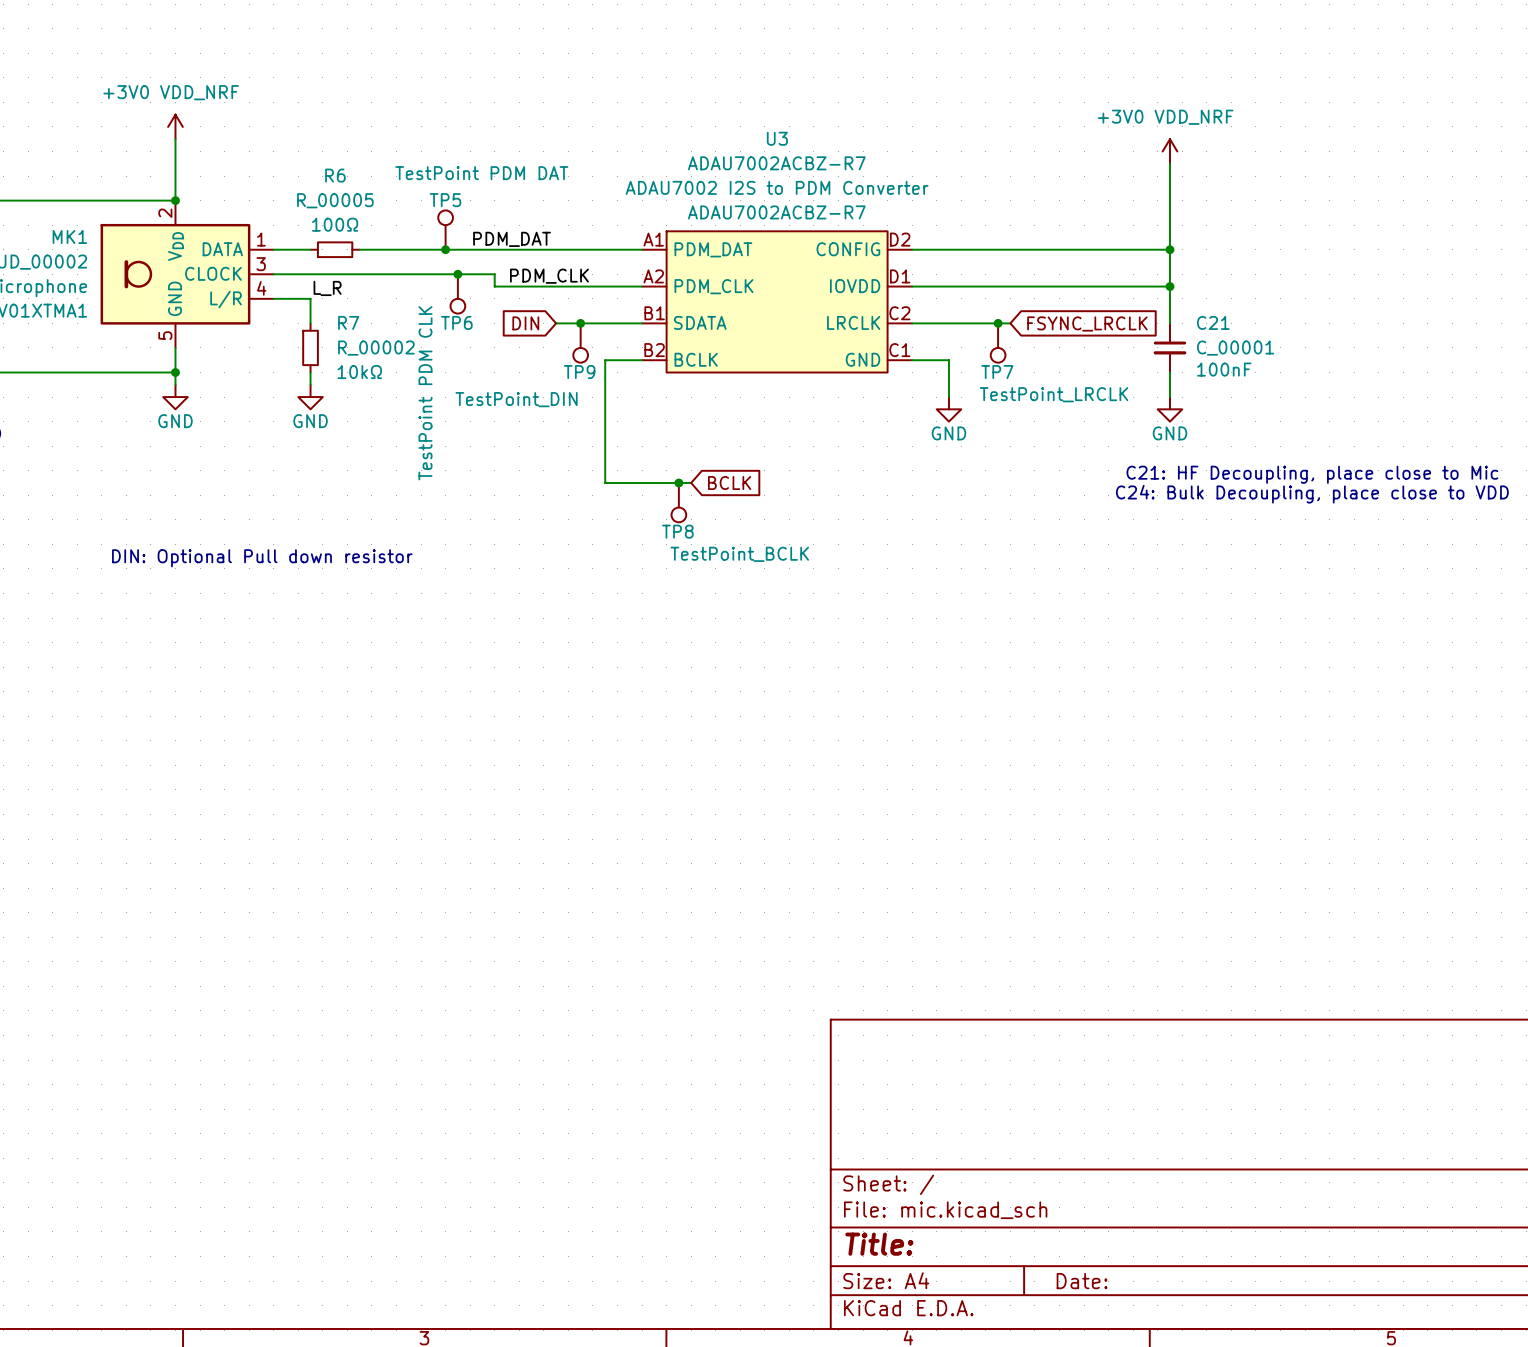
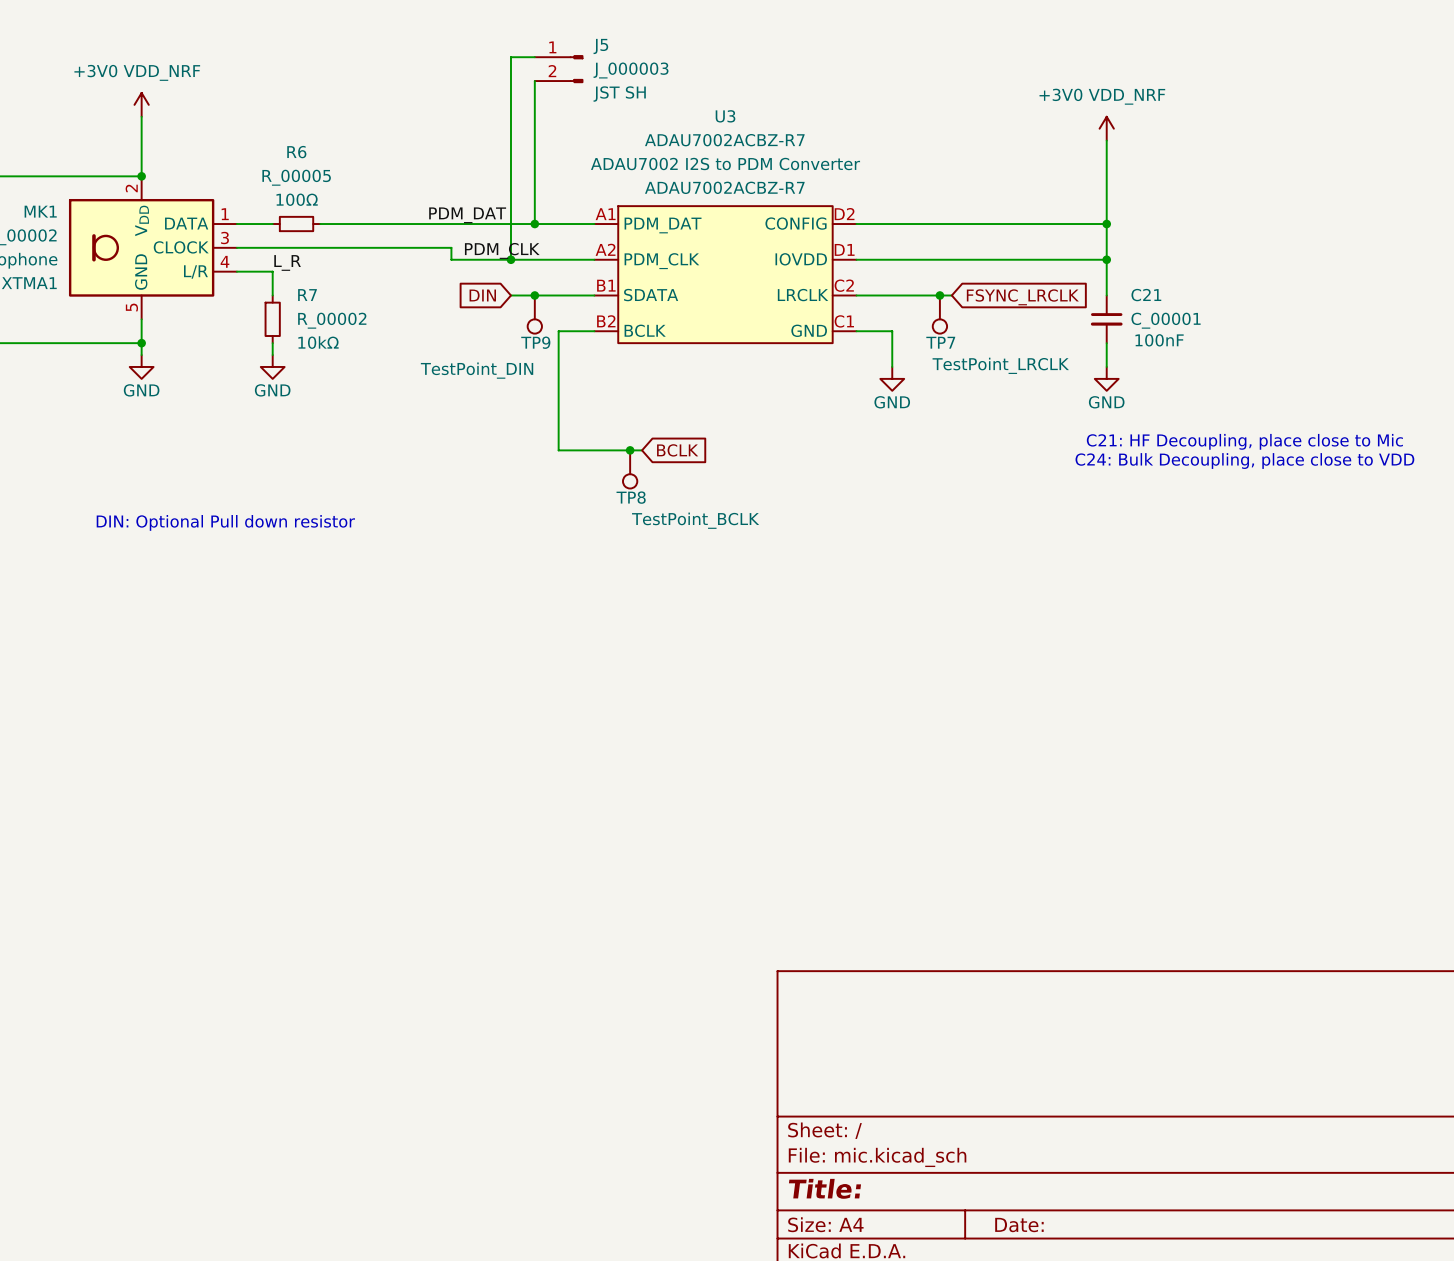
wire: none -> (534, 57) (510, 57) (510, 259)
J5: none -> J_000003 (559, 69)
wire: none -> (534, 81) (534, 224)
TP5: TestPoint PDM DAT (445, 230) -> none
junction: (445, 249) -> none
junction: none -> (534, 224)
junction: (457, 274) -> none
junction: none -> (510, 259)
TP6: TestPoint PDM CLK (457, 293) -> none

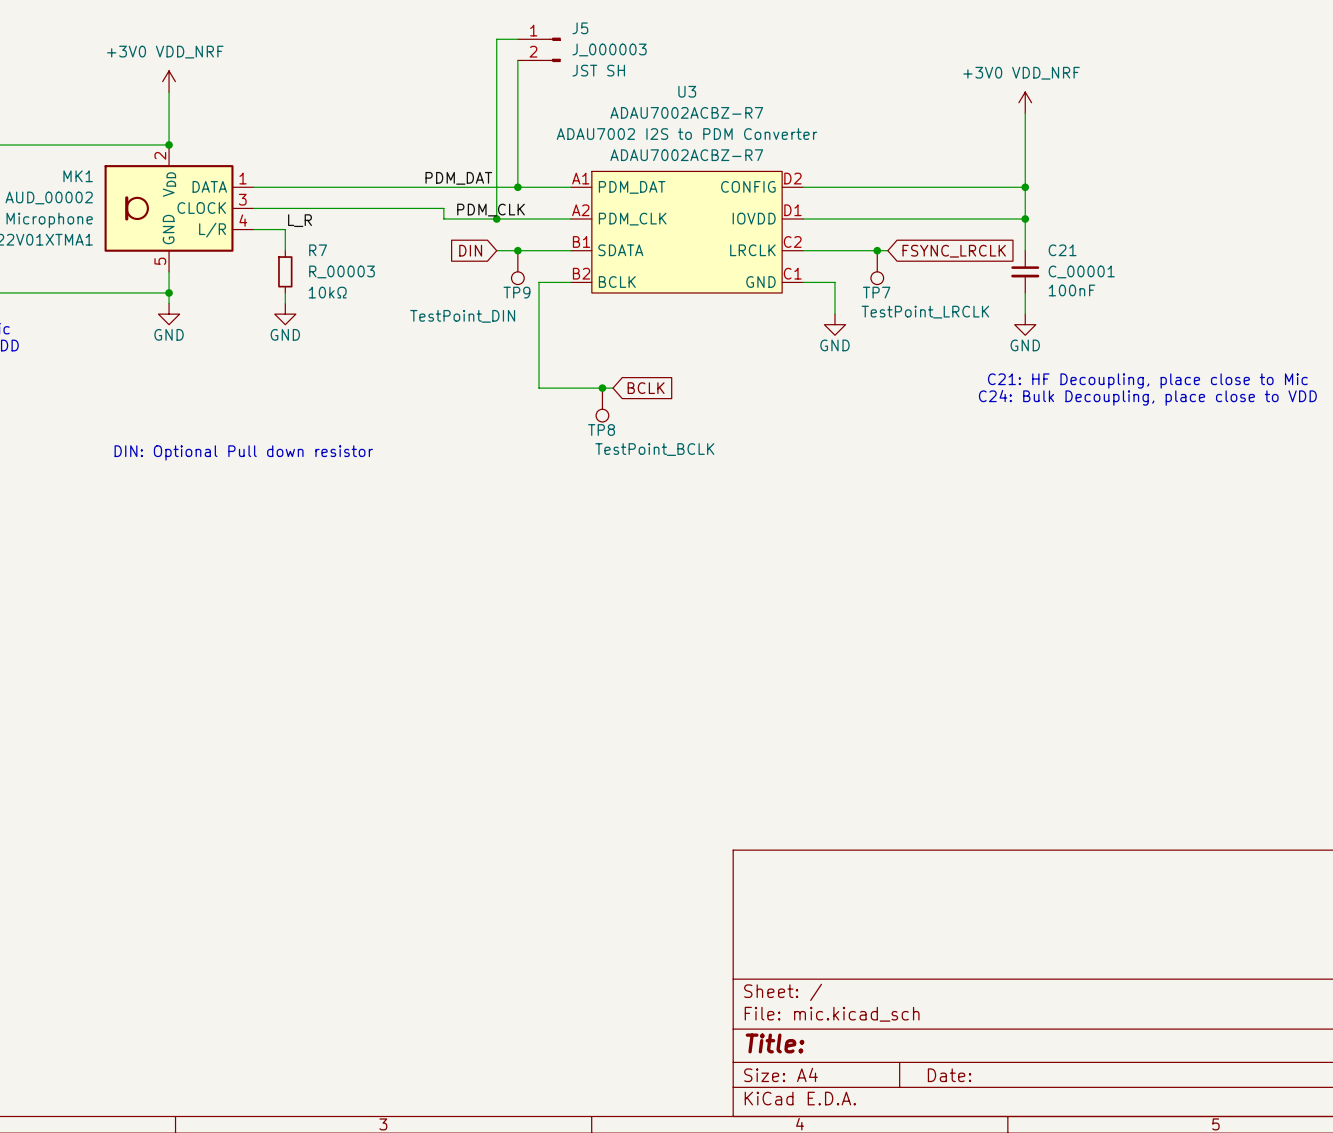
wire: none -> (285, 187) (327, 187)
R6: R_00005 (296, 224) -> none
R7 value: R_00002 (332, 320) -> R_00003 (342, 271)

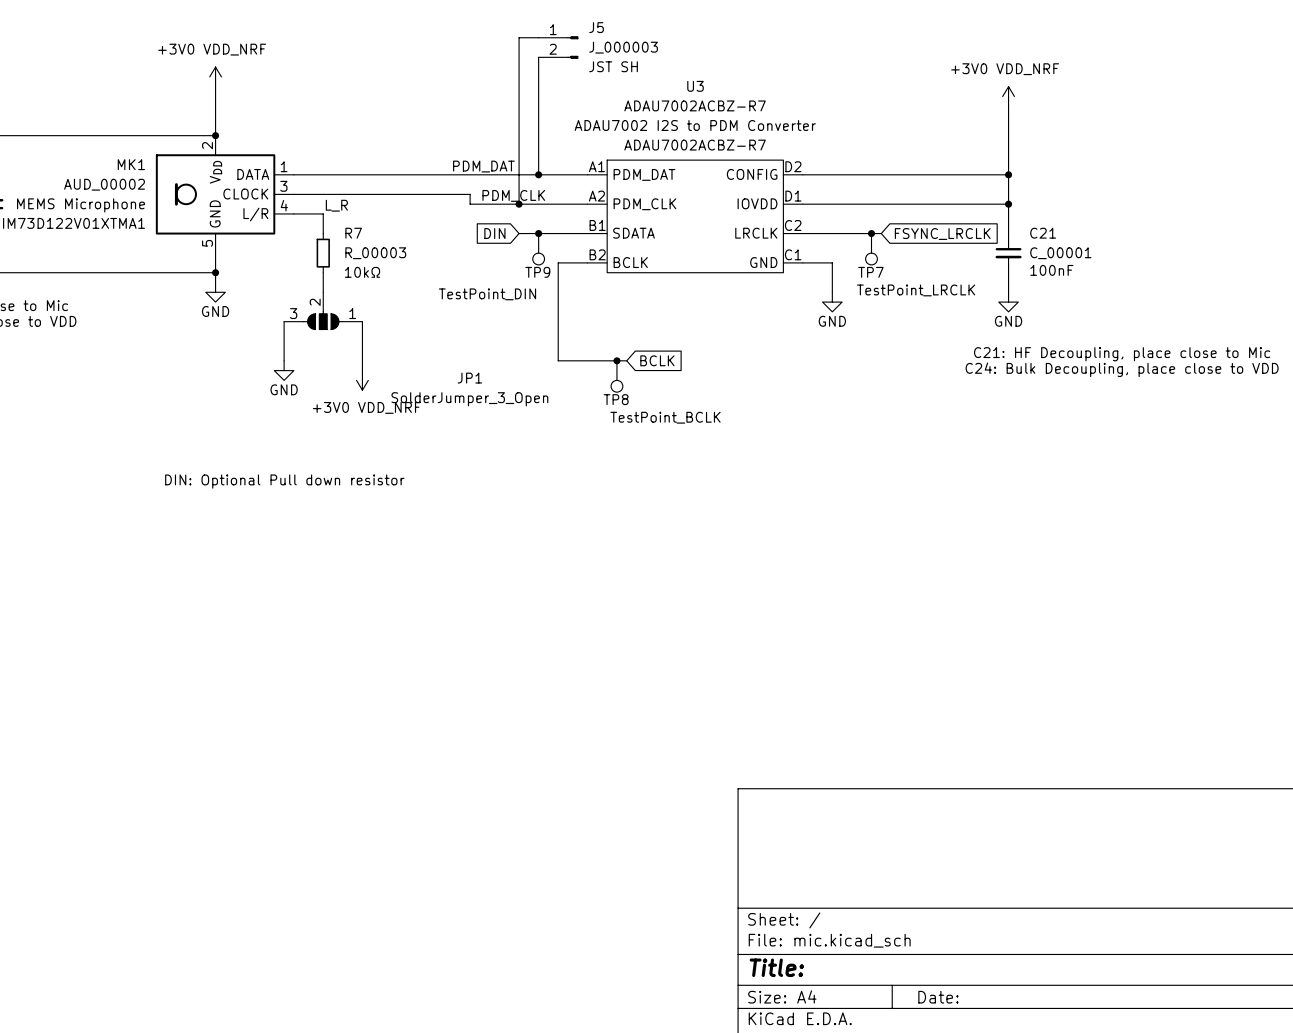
power symbol position: GND (285, 314) -> GND (284, 370)
JP1: none -> SolderJumper_3_Open (323, 310)
wire: none -> (284, 321) (284, 360)
wire: none -> (362, 321) (362, 370)
power symbol: none -> +3V0 VDD_NRF (362, 380)
text position: DIN: Optional Pull down resistor (243, 452) -> DIN: Optional Pull down resistor (284, 481)

